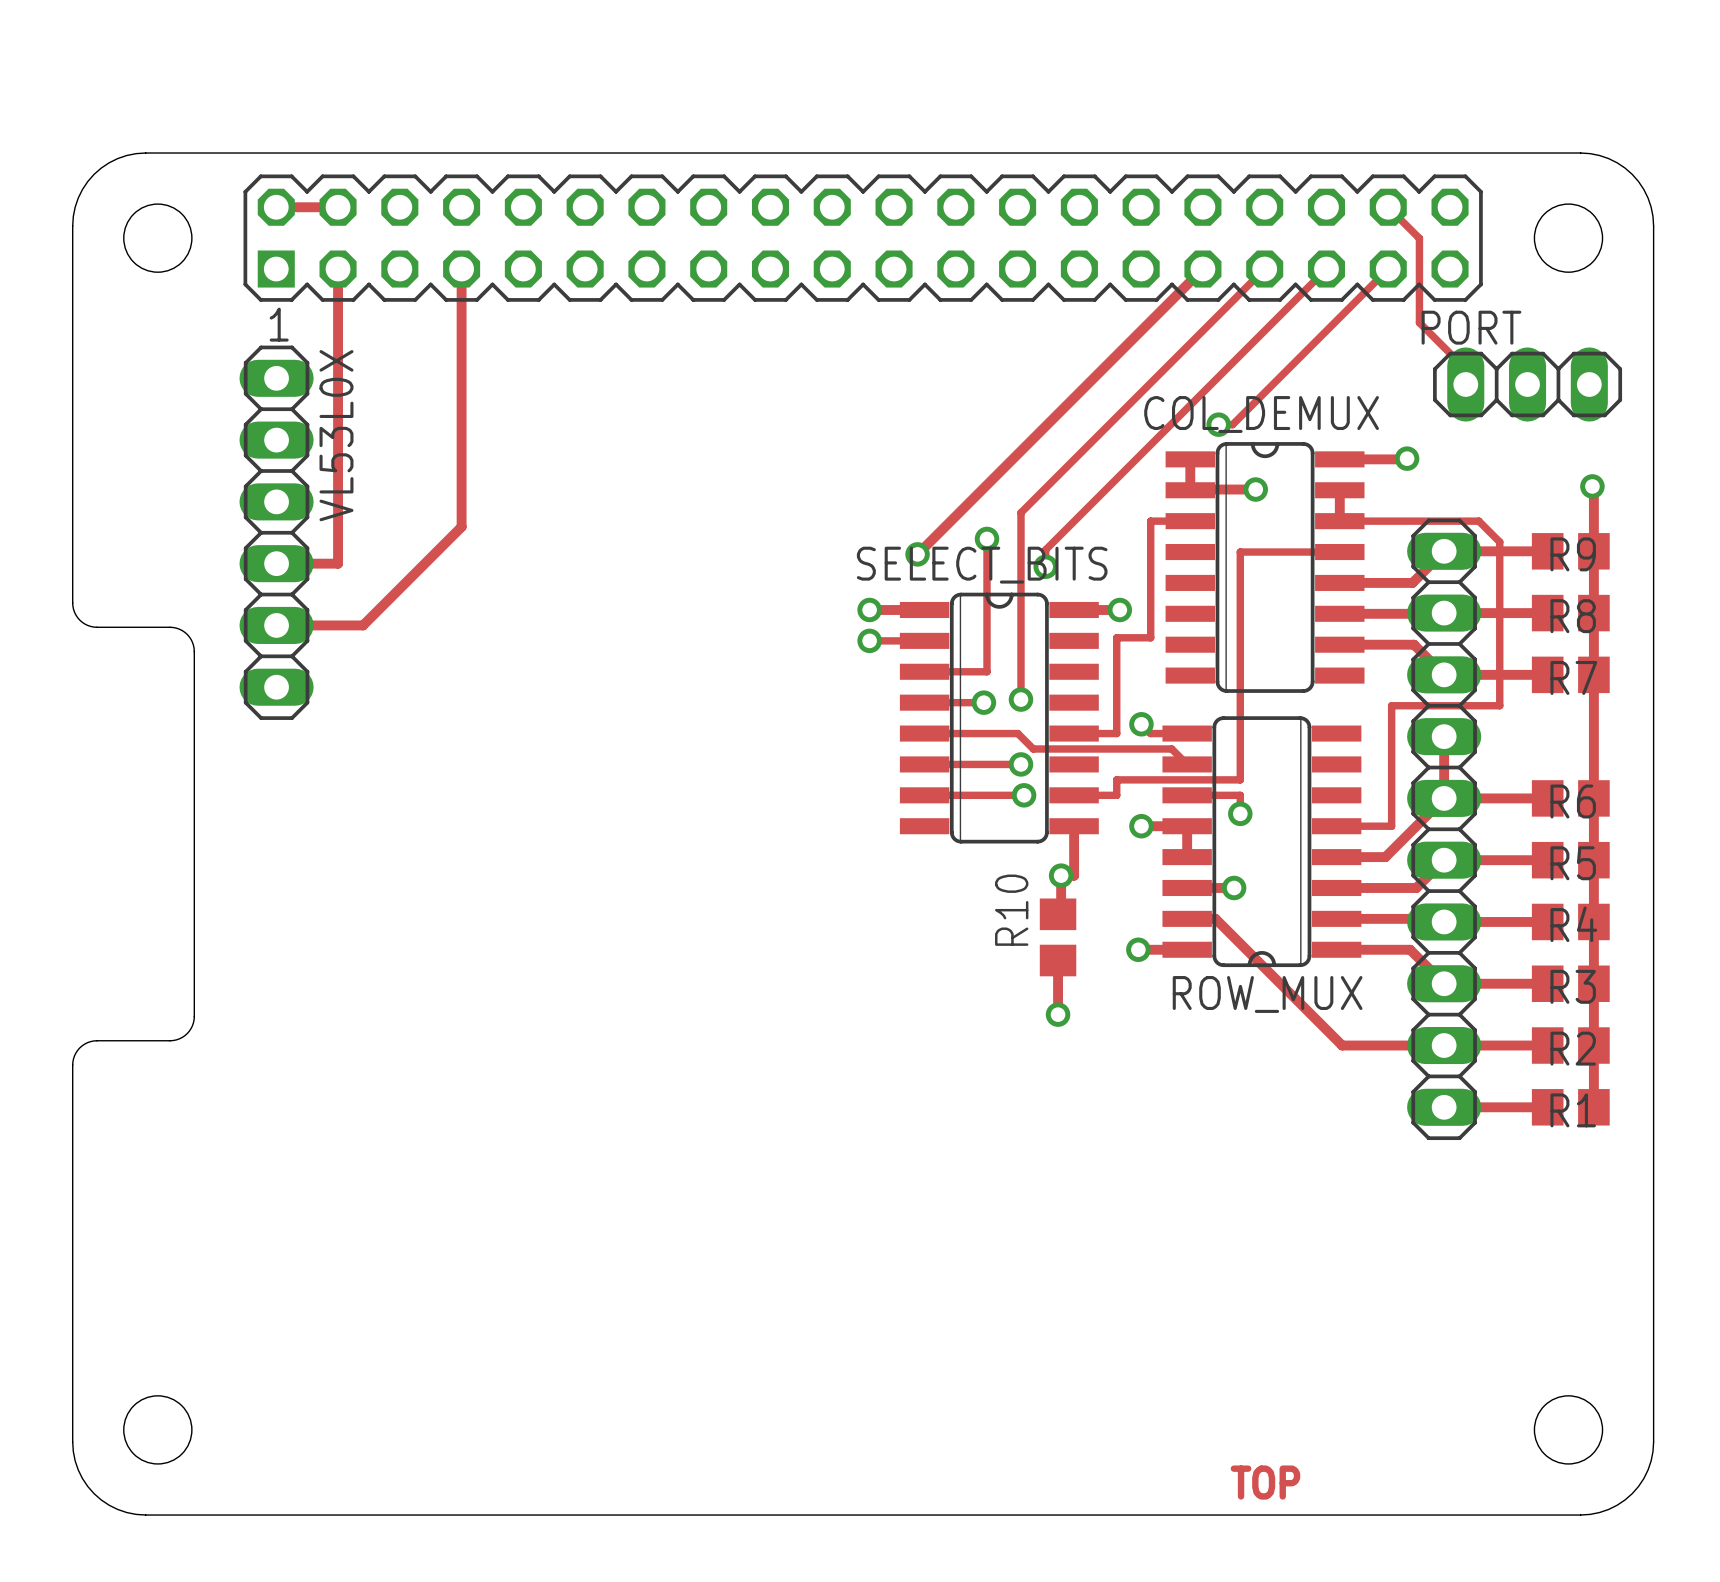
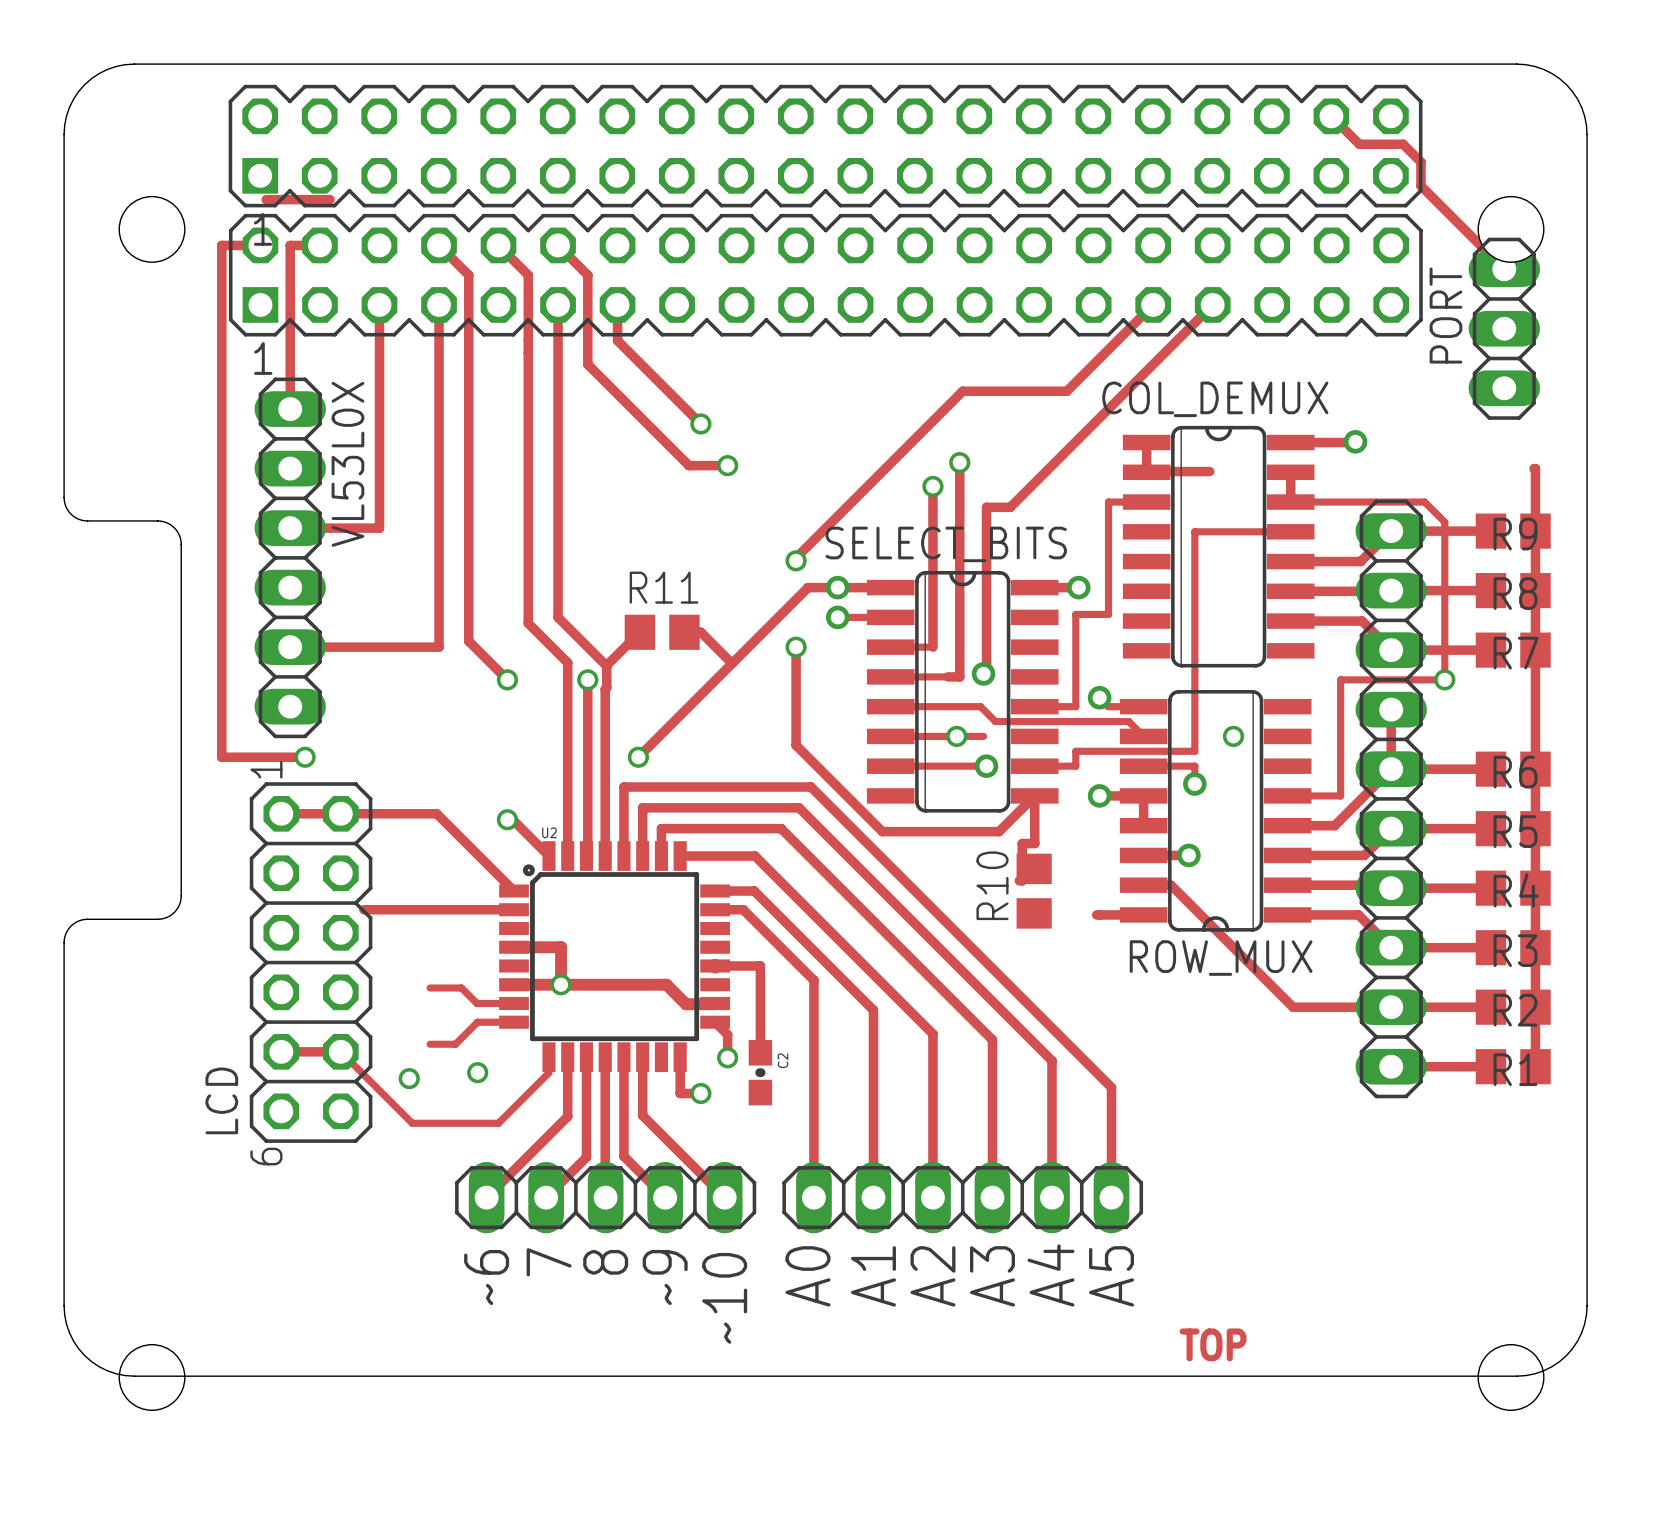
track: none -> (1331, 116) (1359, 144) (1403, 144) (1420, 162) (1420, 185) (1504, 269)
part: none -> (825, 146)
board edge: (145, 153) (1580, 153) (1608, 158) (1632, 174) (1648, 198) (1653, 225) (1653, 1442) (1648, 1469) (1632, 1493) (1608, 1509) (1580, 1515) (145, 1515) (117, 1509) (94, 1493) (78, 1469) (72, 1442) (73, 1058) (82, 1045) (93, 1040) (169, 1040) (179, 1038) (189, 1031) (194, 1016) (193, 645) (184, 632) (173, 627) (97, 627) (87, 625) (77, 617) (72, 602) (73, 216) (82, 189) (101, 168) (126, 155) (145, 153) -> (134, 64) (1516, 64) (1543, 69) (1566, 84) (1581, 107) (1587, 134) (1587, 1305) (1581, 1332) (1566, 1355) (1543, 1370) (1516, 1376) (134, 1376) (107, 1370) (84, 1355) (69, 1332) (64, 1305) (64, 936) (73, 924) (84, 919) (157, 919) (166, 917) (176, 910) (181, 895) (180, 538) (172, 525) (160, 521) (87, 520) (78, 519) (68, 511) (64, 497) (64, 125) (73, 99) (91, 78) (116, 66) (134, 64)
track: (1388, 207) (1419, 238) (1419, 322) (1465, 369) (1465, 384) -> none
part: (863, 238) -> none
track: none -> (260, 245) (221, 245) (221, 757) (305, 757)
track: none -> (319, 245) (290, 245) (290, 409)
track: none -> (439, 245) (468, 275) (468, 641) (507, 679)
track: none -> (498, 245) (528, 275) (528, 623) (567, 662) (567, 856)
track: none -> (558, 245) (587, 275) (587, 364) (688, 465) (727, 465)
track: (338, 269) (338, 563) (276, 563) -> none
track: (461, 269) (461, 526) (363, 625) (276, 625) -> none
track: (1202, 269) (917, 554) -> none
track: (1264, 269) (1020, 512) (1020, 699) -> none
track: (1326, 269) (1045, 549) (1045, 566) -> none
track: (1388, 269) (1232, 424) (1218, 424) -> none
part: none -> (825, 275)
track: none -> (379, 304) (379, 528) (290, 528)
track: none -> (439, 304) (439, 647) (290, 647)
track: none -> (558, 304) (558, 617) (606, 666)
track: none -> (617, 304) (617, 340) (700, 423)
track: none -> (1153, 304) (1066, 391) (962, 391) (796, 557) (796, 560)
track: none -> (1212, 304) (1010, 507) (986, 507) (986, 676)
PORT name position: PORT (1471, 327) -> PORT (1445, 315)
PORT rotation: 0° (1527, 384) -> 90° clockwise (1504, 328)
via: (1218, 424) -> none
via: none -> (700, 423)
track: none -> (959, 462) (959, 676) (947, 676)
via: none -> (959, 462)
via: none -> (727, 465)
via: (1592, 486) -> none
via: (1255, 489) -> none
via: none -> (932, 486)
VL53L0X position: (276, 532) -> (290, 557)
track: (987, 538) (987, 671) (968, 671) -> (932, 486) (932, 647)
via: (987, 538) -> none
via: (917, 554) -> none
via: (1045, 566) -> none
via: none -> (796, 560)
track: none -> (837, 587) (807, 587) (638, 757)
track: none -> (639, 632) (606, 665) (605, 855)
R11: none -> (662, 632)
track: none -> (684, 632) (700, 632) (732, 663)
track: none -> (796, 647) (796, 745) (882, 831) (999, 831) (1034, 795)
via: none -> (796, 647)
via: (983, 702) -> none
via: none -> (507, 679)
track: none -> (587, 679) (586, 856)
via: none -> (587, 679)
via: none -> (1444, 679)
via: none -> (956, 736)
via: (1020, 764) -> none
via: none -> (1233, 736)
via: none -> (305, 757)
via: none -> (638, 757)
track: none -> (281, 813) (436, 813) (514, 891)
track: none -> (507, 819) (512, 819) (548, 856)
via: none -> (507, 819)
via: (1061, 875) -> none
track: none -> (623, 856) (623, 787) (810, 787) (1111, 1087) (1111, 1197)
track: none -> (642, 856) (642, 807) (799, 807) (1052, 1060) (1052, 1197)
track: none -> (661, 856) (661, 828) (781, 828) (992, 1039) (992, 1197)
track: none -> (680, 856) (755, 856) (932, 1033) (932, 1197)
R10 name position: R10 (1011, 910) -> R10 (992, 885)
track: none -> (715, 891) (754, 891) (873, 1010) (873, 1197)
R10 position: (1058, 937) -> (1034, 891)
track: none -> (363, 909) (514, 909)
track: none -> (715, 909) (743, 909) (813, 980) (813, 1197)
via: (1138, 949) -> none
track: (1058, 960) (1058, 1014) -> none
track: none -> (514, 947) (561, 947) (561, 984)
U2: none -> (614, 956)
LCD: none -> (311, 962)
track: none -> (715, 965) (760, 965) (760, 1052)
via: (1058, 1014) -> none
track: none -> (514, 984) (666, 984) (685, 1004) (715, 1003)
via: none -> (561, 984)
track: none -> (430, 988) (461, 988) (476, 1003) (514, 1003)
track: none -> (514, 1022) (477, 1022) (455, 1044) (430, 1044)
track: none -> (715, 1022) (727, 1034) (727, 1057)
track: none -> (281, 1051) (340, 1051) (412, 1123) (498, 1123) (548, 1072)
track: none -> (567, 1057) (567, 1116) (486, 1197)
track: none -> (586, 1057) (586, 1157) (546, 1197)
track: none -> (605, 1057) (605, 1197)
track: none -> (623, 1057) (623, 1156) (665, 1197)
track: none -> (642, 1057) (642, 1115) (724, 1197)
track: none -> (680, 1057) (680, 1093) (700, 1093)
via: none -> (727, 1057)
via: none -> (477, 1072)
C2: none -> (760, 1072)
via: none -> (409, 1078)
via: none -> (700, 1093)
part: none -> (605, 1197)
part: none -> (962, 1197)
text: none -> 7 (549, 1262)
text: none -> 8 (605, 1262)
text: none -> A0 (807, 1276)
text: none -> A1 (873, 1276)
text: none -> A2 (932, 1276)
text: none -> A3 (992, 1276)
text: none -> A4 (1051, 1275)
text: none -> A5 (1111, 1276)
text: none -> ~6 (486, 1277)
text: none -> ~9 (665, 1277)
text: none -> ~10 (724, 1298)
text position: TOP (1265, 1482) -> TOP (1213, 1344)

